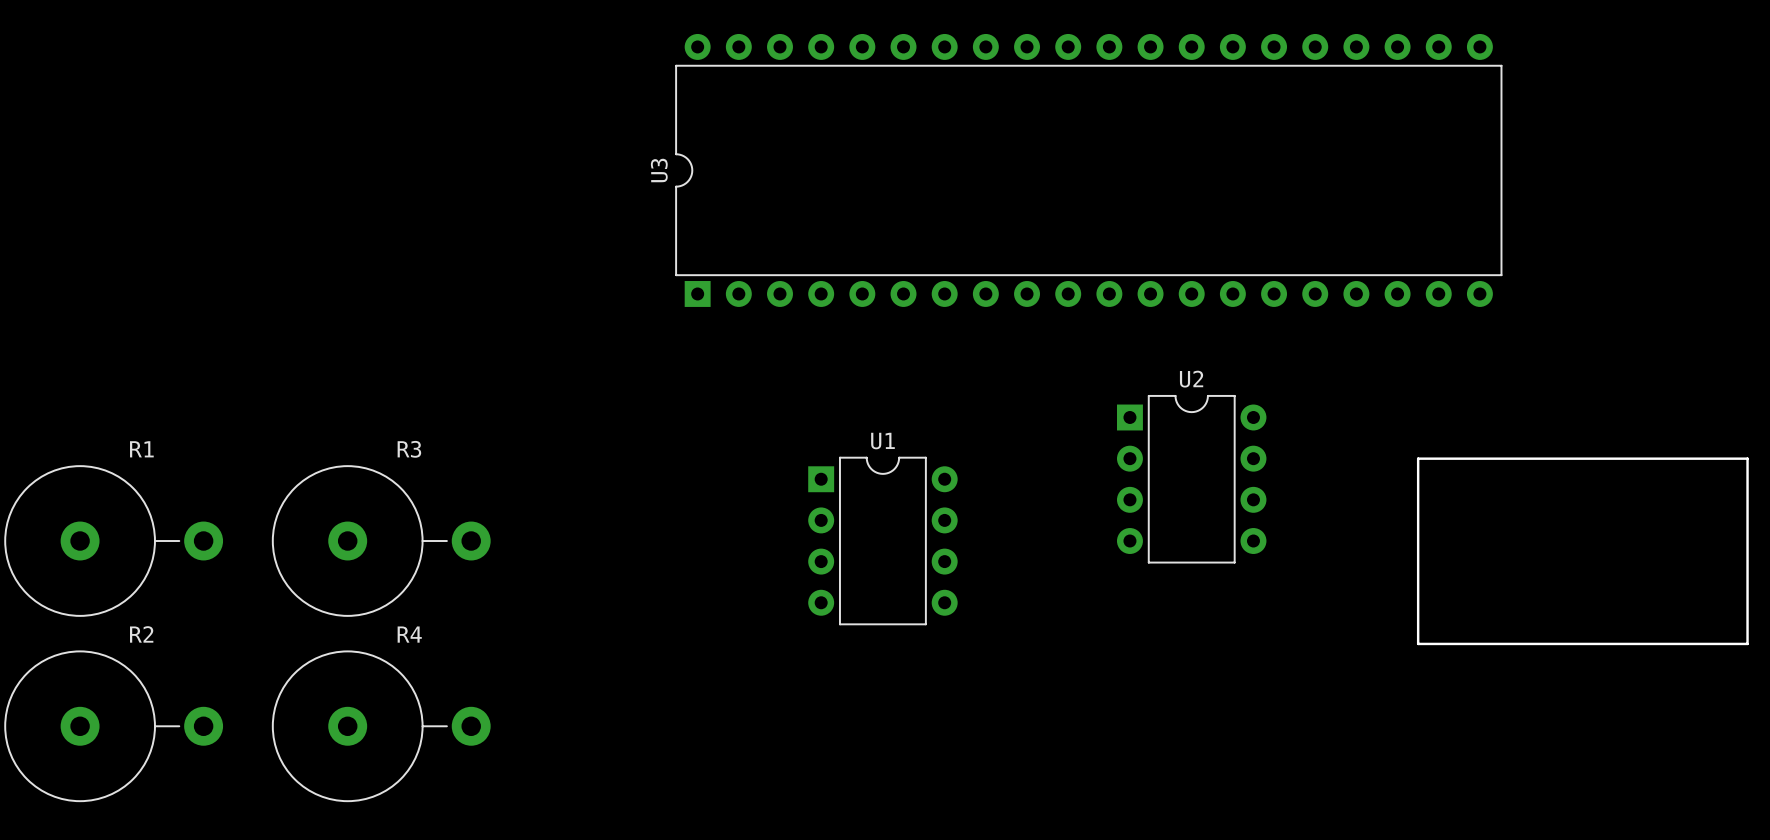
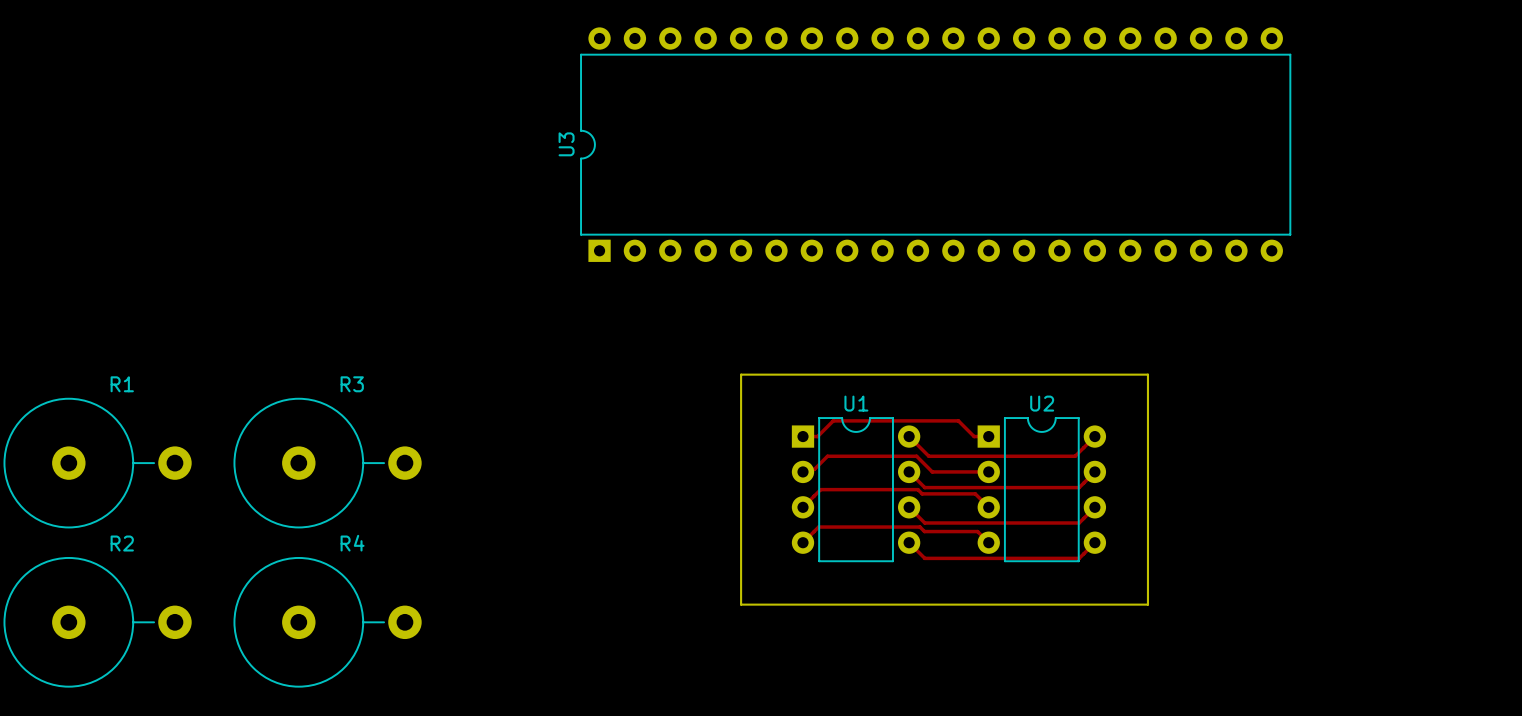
board edge: none -> (741, 374) (1147, 374) (1147, 604) (741, 604) (741, 374)
board edge: (1418, 458) (1418, 643) (1747, 643) (1747, 458) (1418, 458) -> none
U2 position: (1191, 479) -> (1041, 489)
track: none -> (803, 436) (817, 436) (833, 420) (958, 420) (974, 436) (988, 436)
track: none -> (909, 436) (928, 456) (1075, 456) (1094, 436)
U1 position: (882, 541) -> (856, 489)
track: none -> (807, 467) (814, 469) (827, 456) (916, 456) (932, 471) (988, 471)
track: none -> (909, 471) (924, 487) (1079, 487) (1094, 471)
track: none -> (803, 507) (820, 489) (917, 489) (922, 493) (975, 493) (988, 507)
track: none -> (909, 507) (924, 522) (1079, 522) (1094, 507)
track: none -> (803, 542) (818, 527) (919, 527) (924, 531) (977, 531) (988, 542)
track: none -> (909, 542) (924, 558) (1079, 558) (1094, 542)

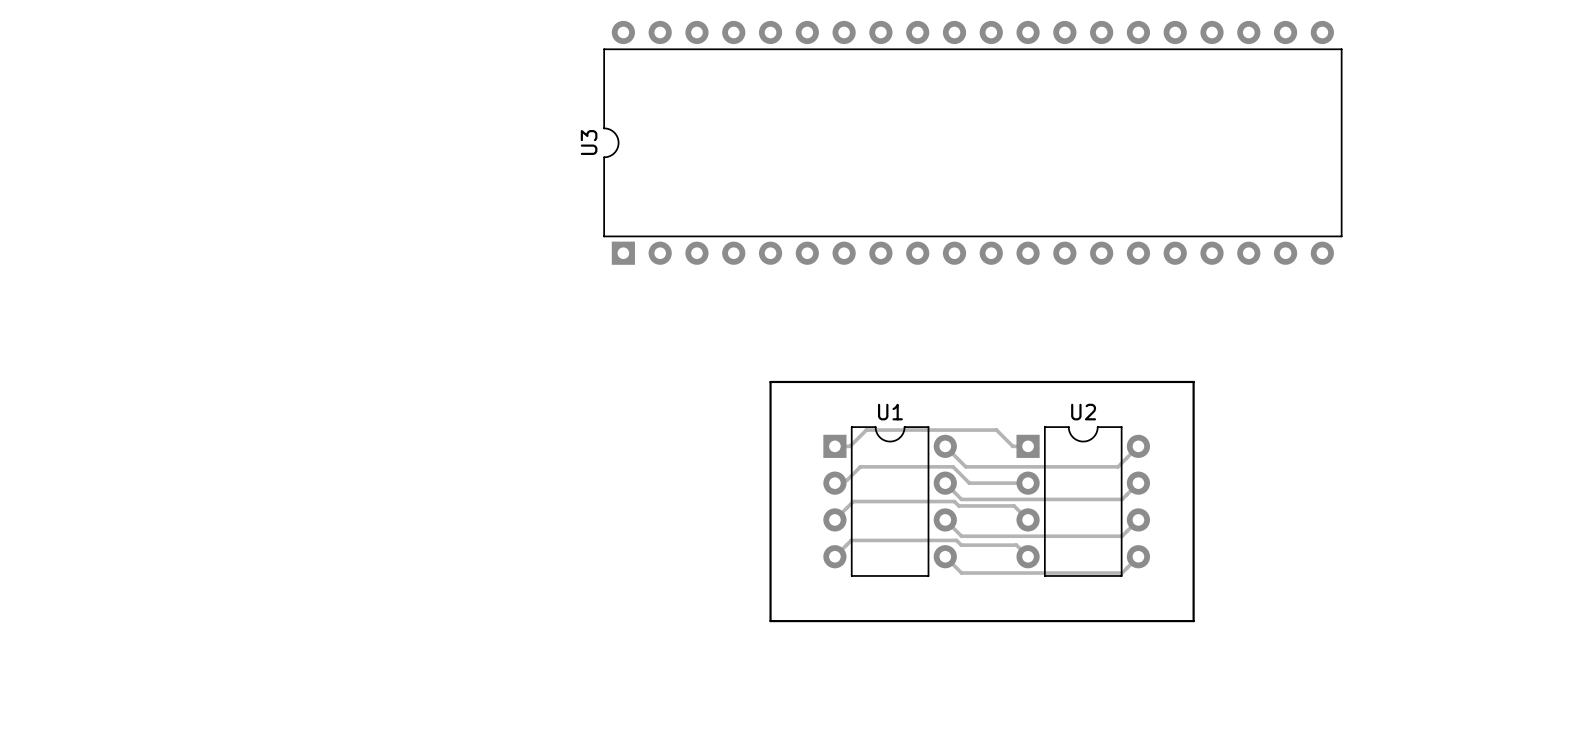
R1: (97, 463) -> none
R3: (327, 463) -> none
R2: (97, 622) -> none
R4: (327, 622) -> none

